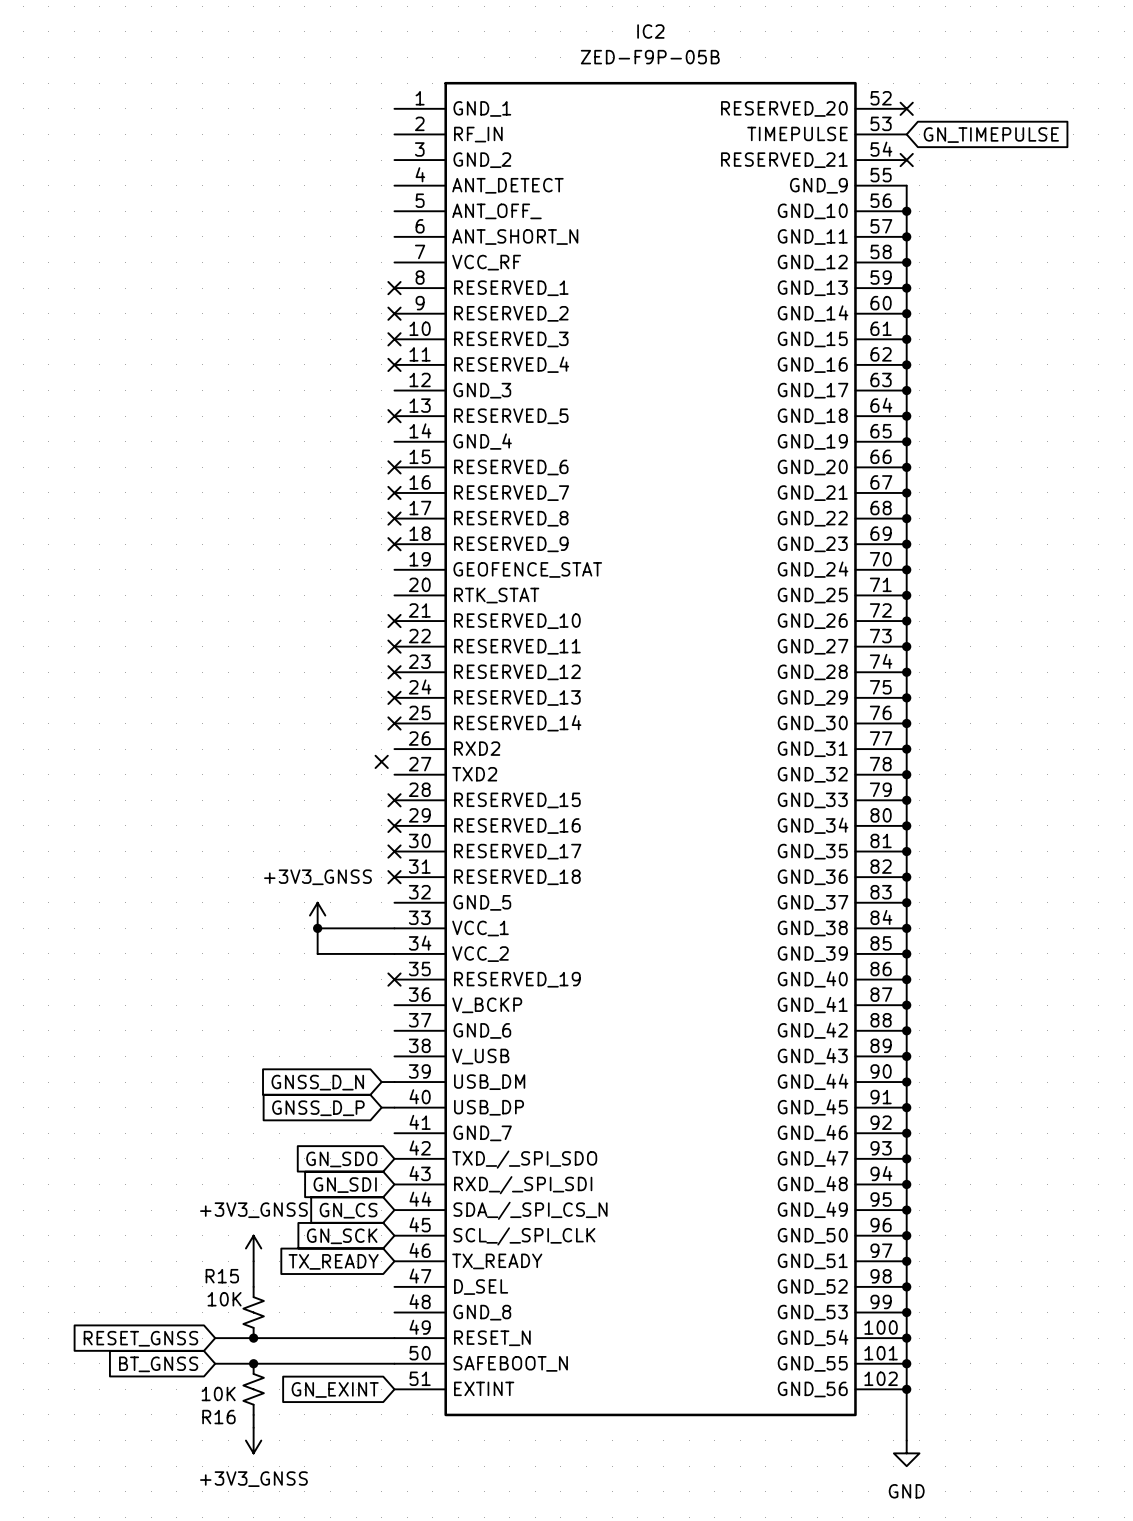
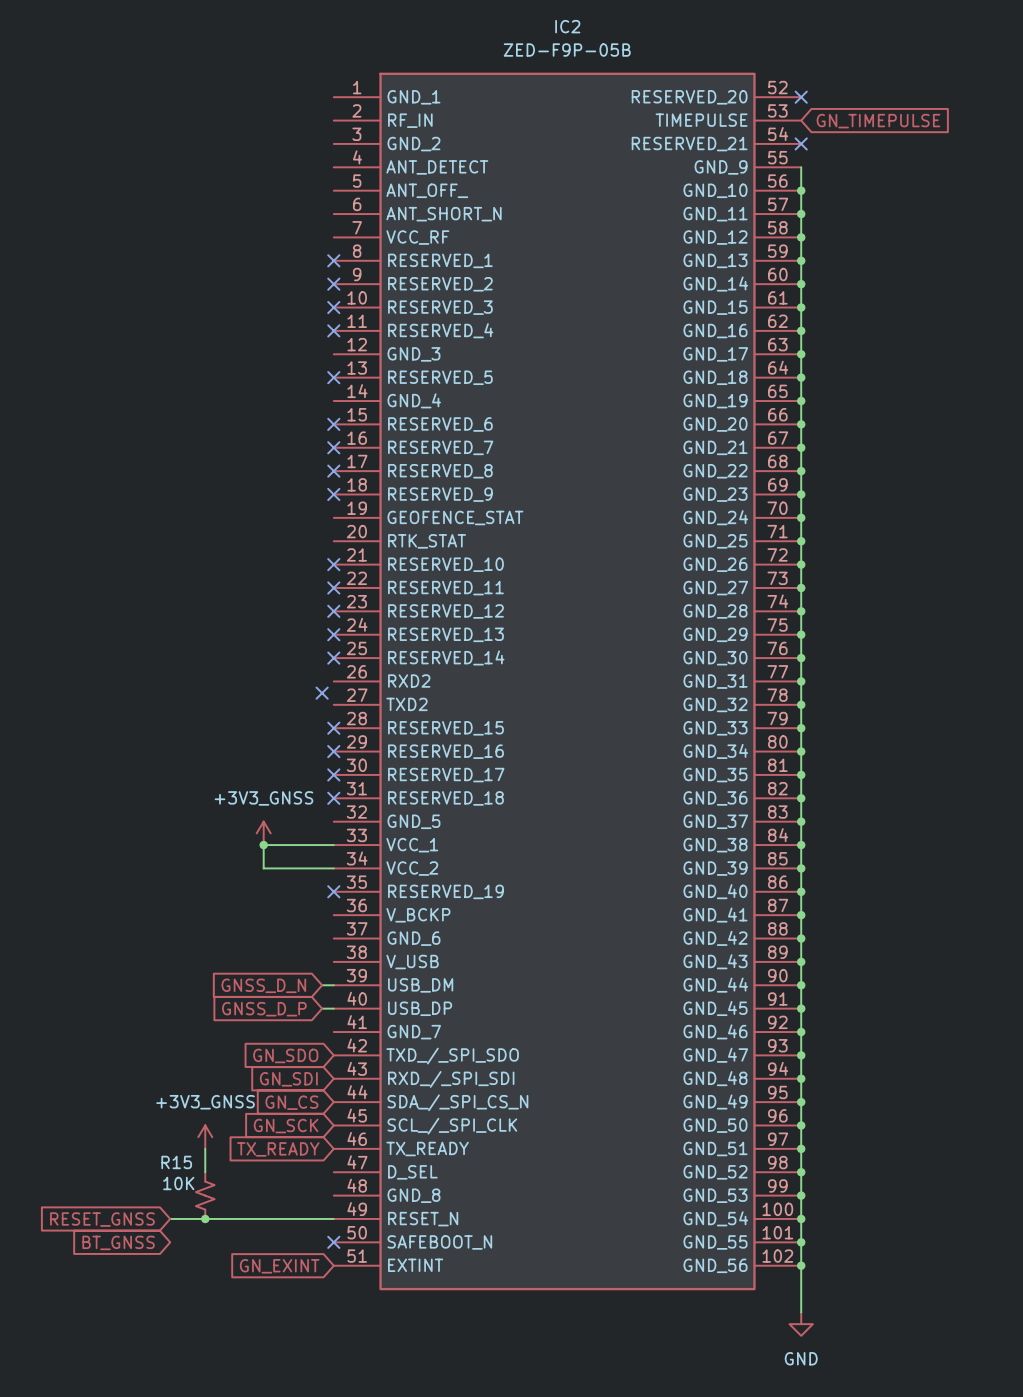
wire: (215, 1363) (394, 1363) -> none
junction: (253, 1363) -> none
no-connect mark: none -> (333, 1242)
R16: 10K (253, 1389) -> none
wire: (253, 1414) (253, 1427) -> none
power symbol: +3V3_GNSS (253, 1440) -> none

